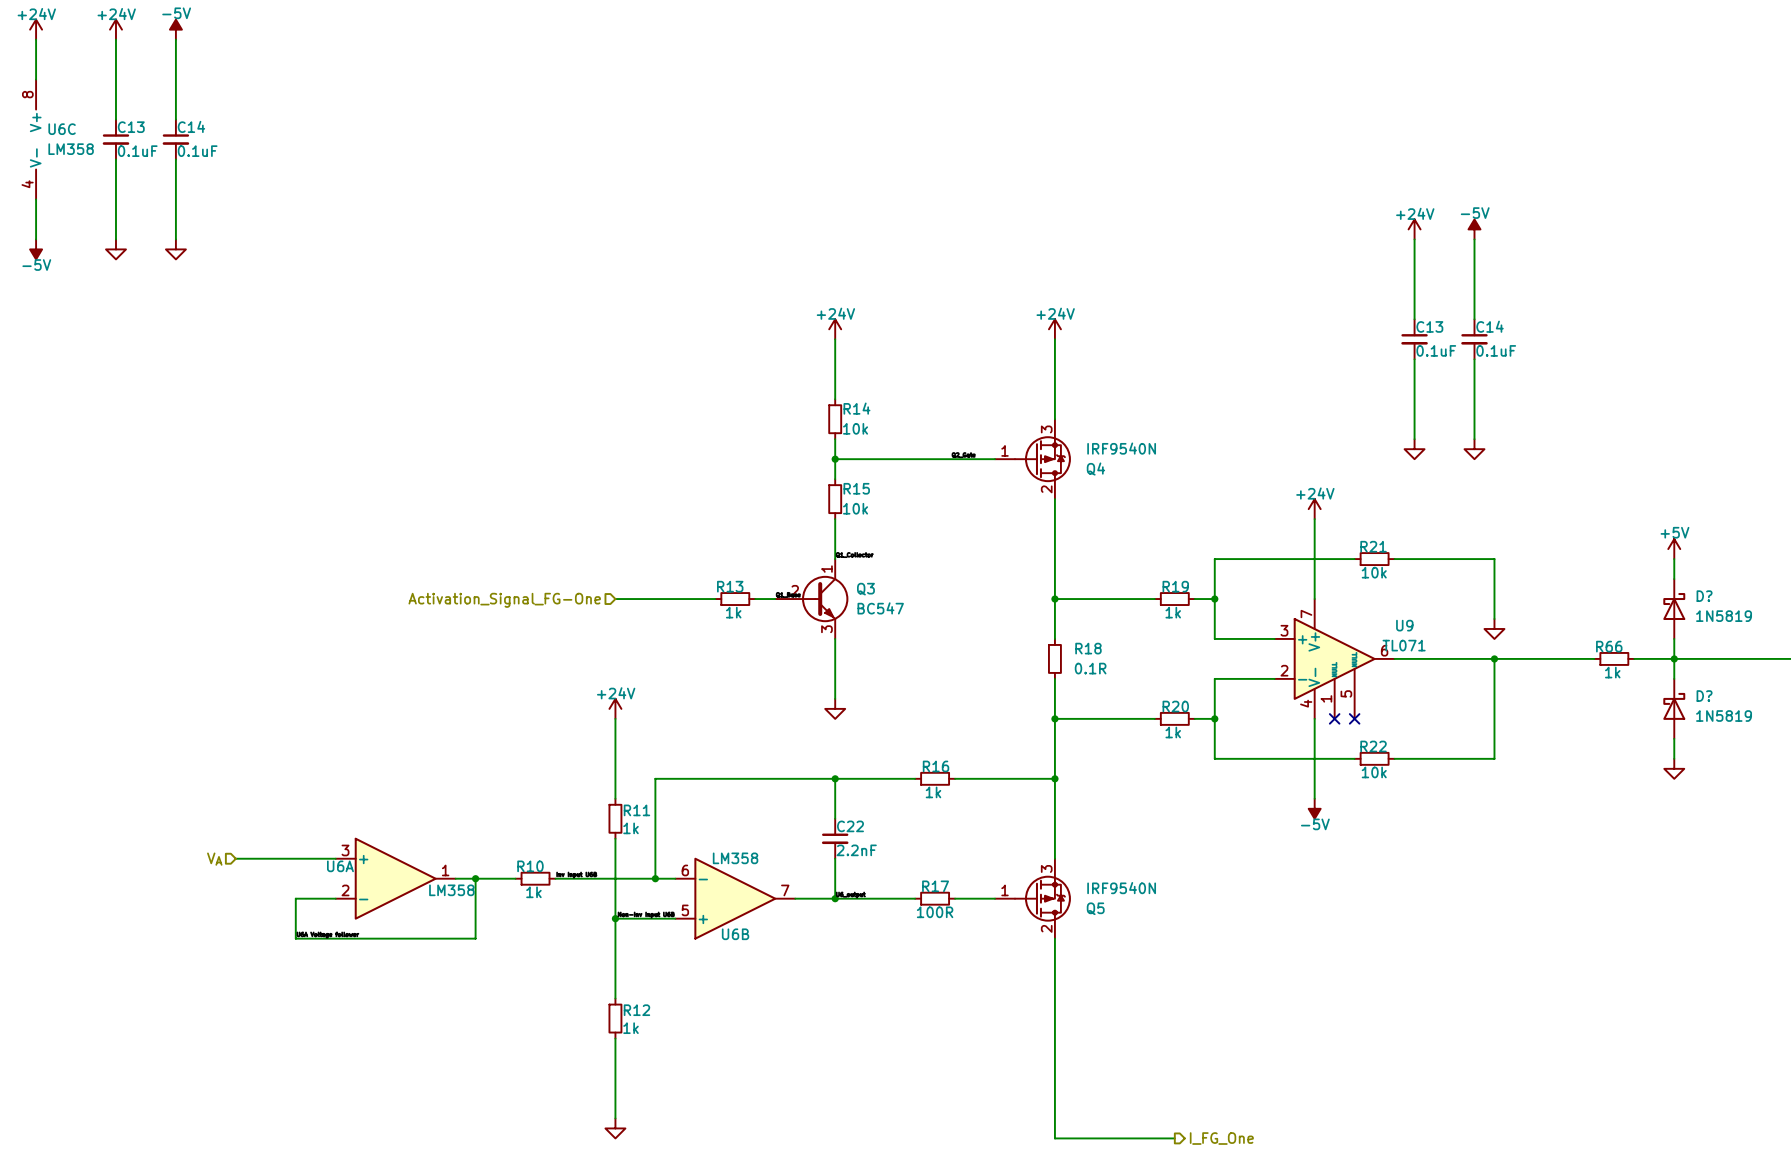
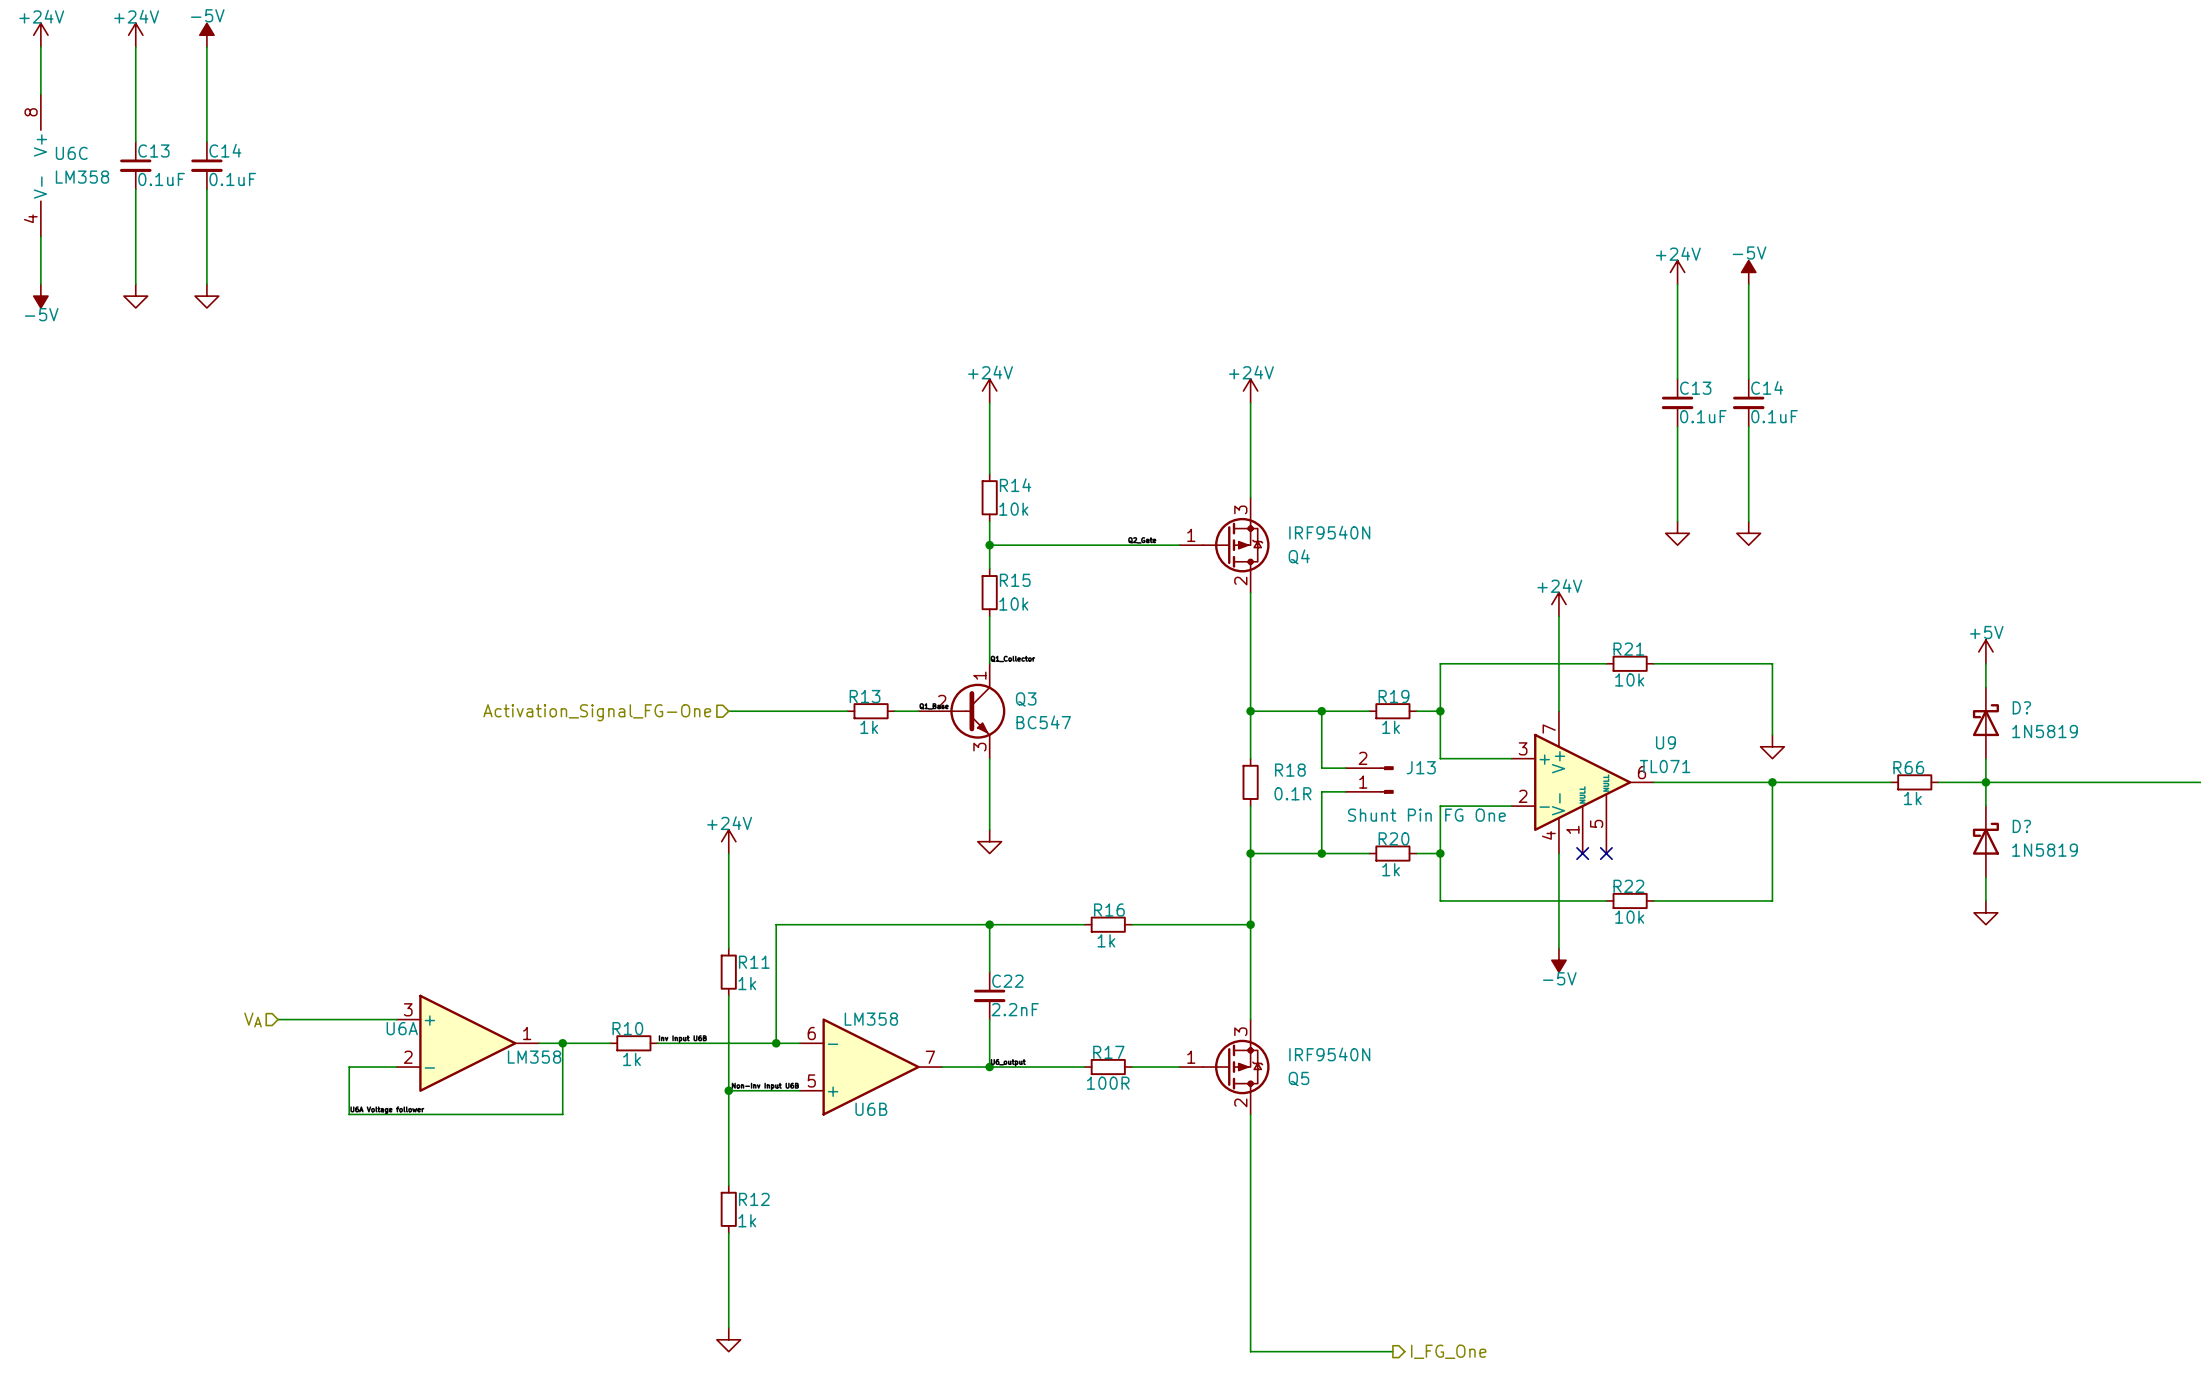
wire: none -> (1321, 711) (1321, 768) (1345, 768)
junction: none -> (1321, 711)
J13: none -> Shunt Pin FG One (1369, 780)
wire: none -> (1345, 791) (1321, 791) (1321, 853)
junction: none -> (1321, 853)

